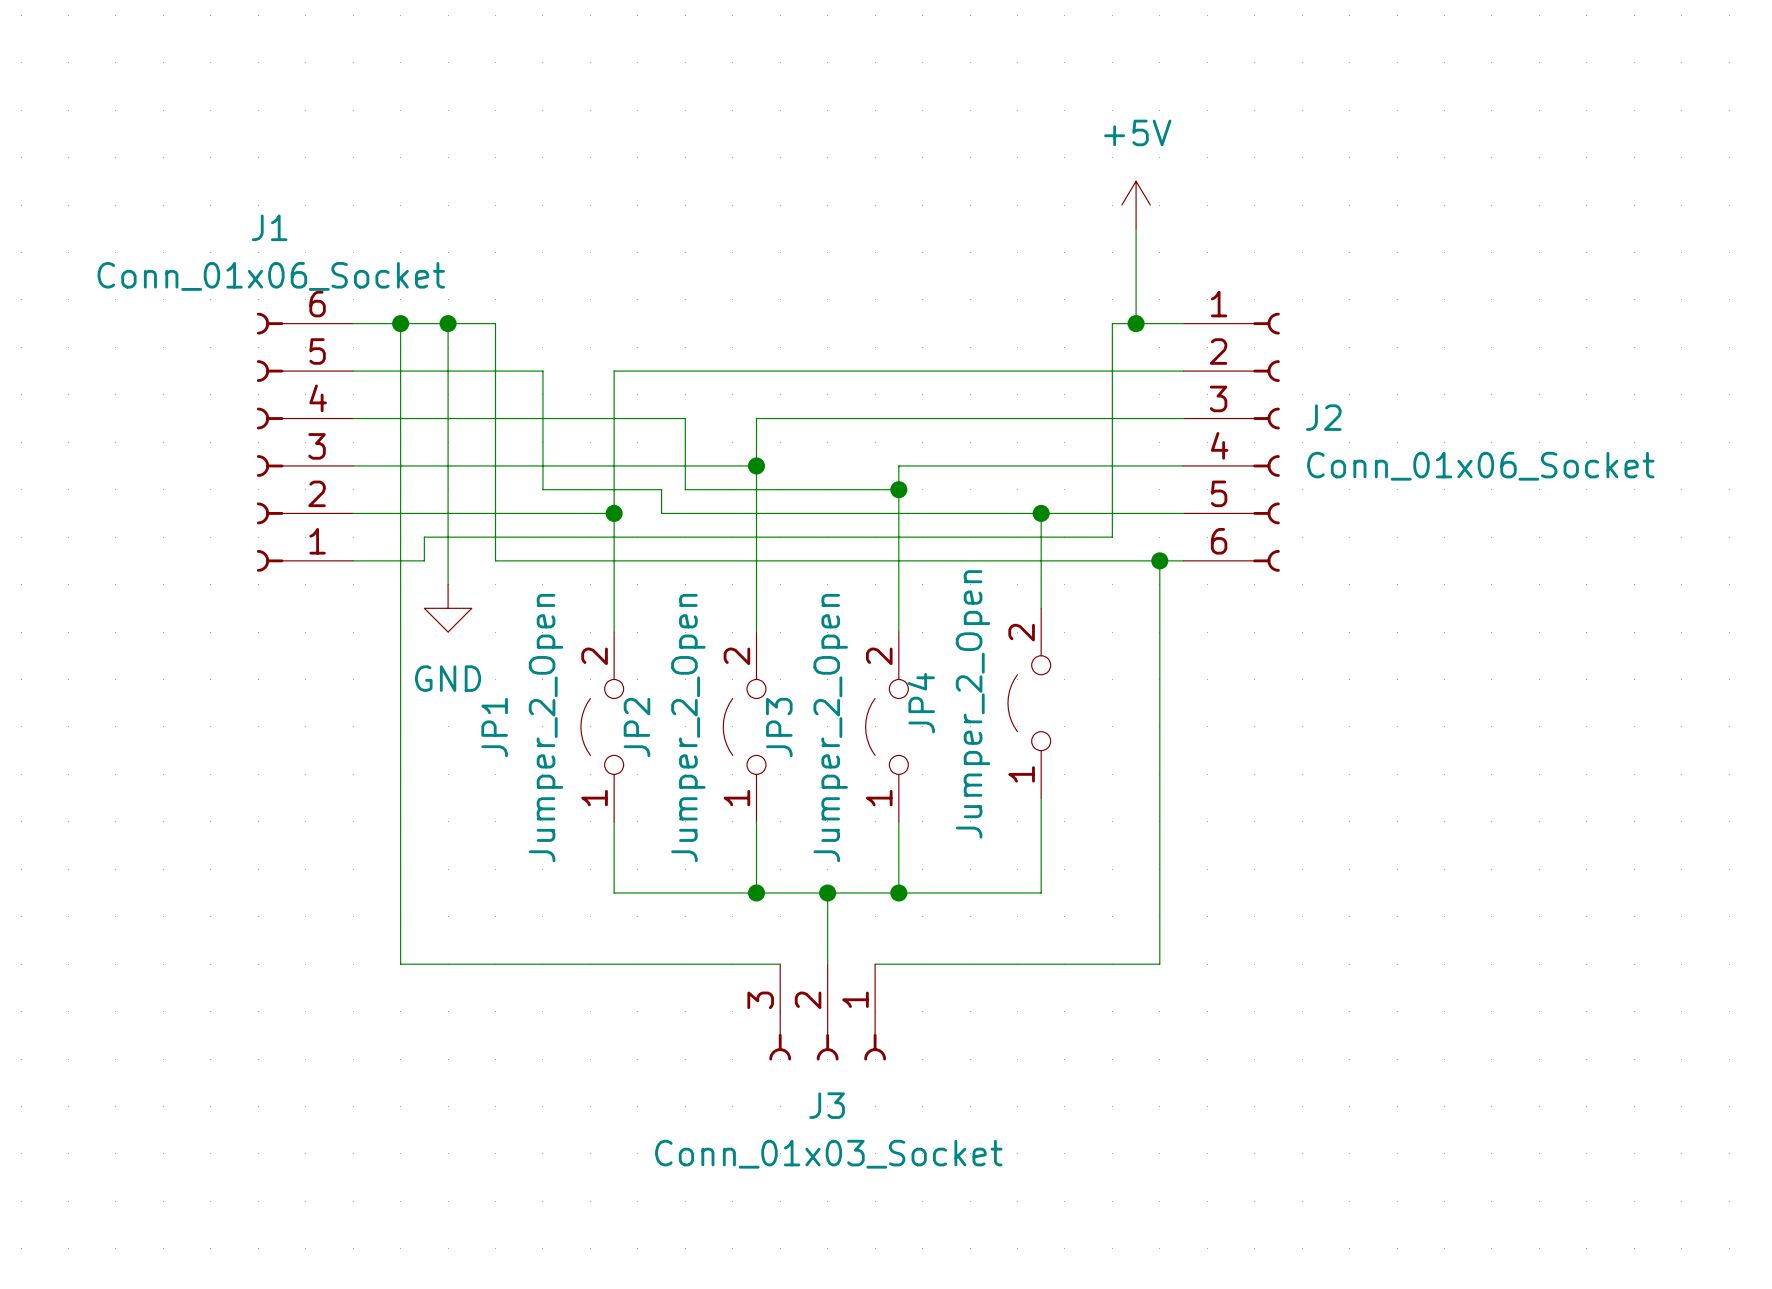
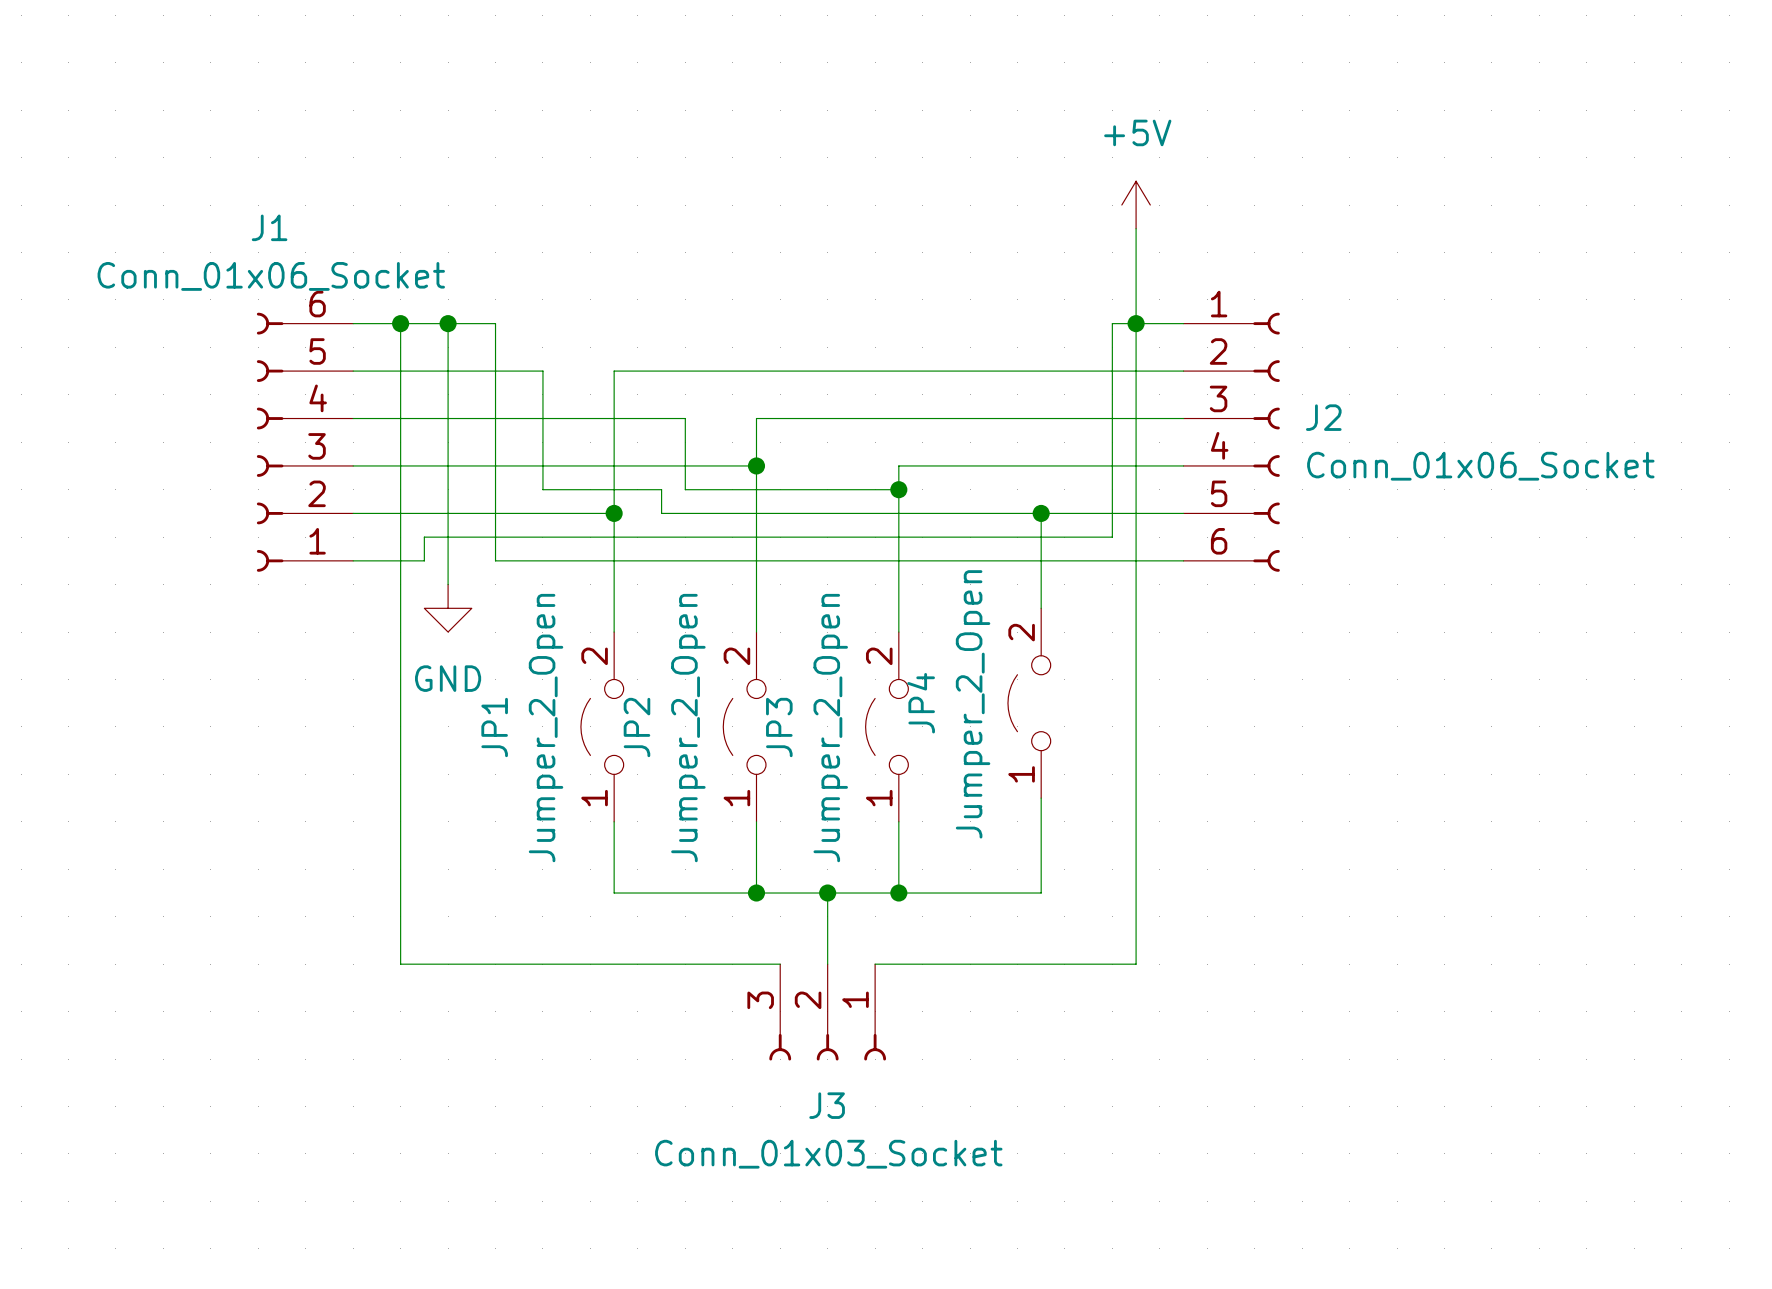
wire: (1159, 560) (1159, 964) (1136, 964) -> (1136, 323) (1136, 964)
junction: (1159, 560) -> none

